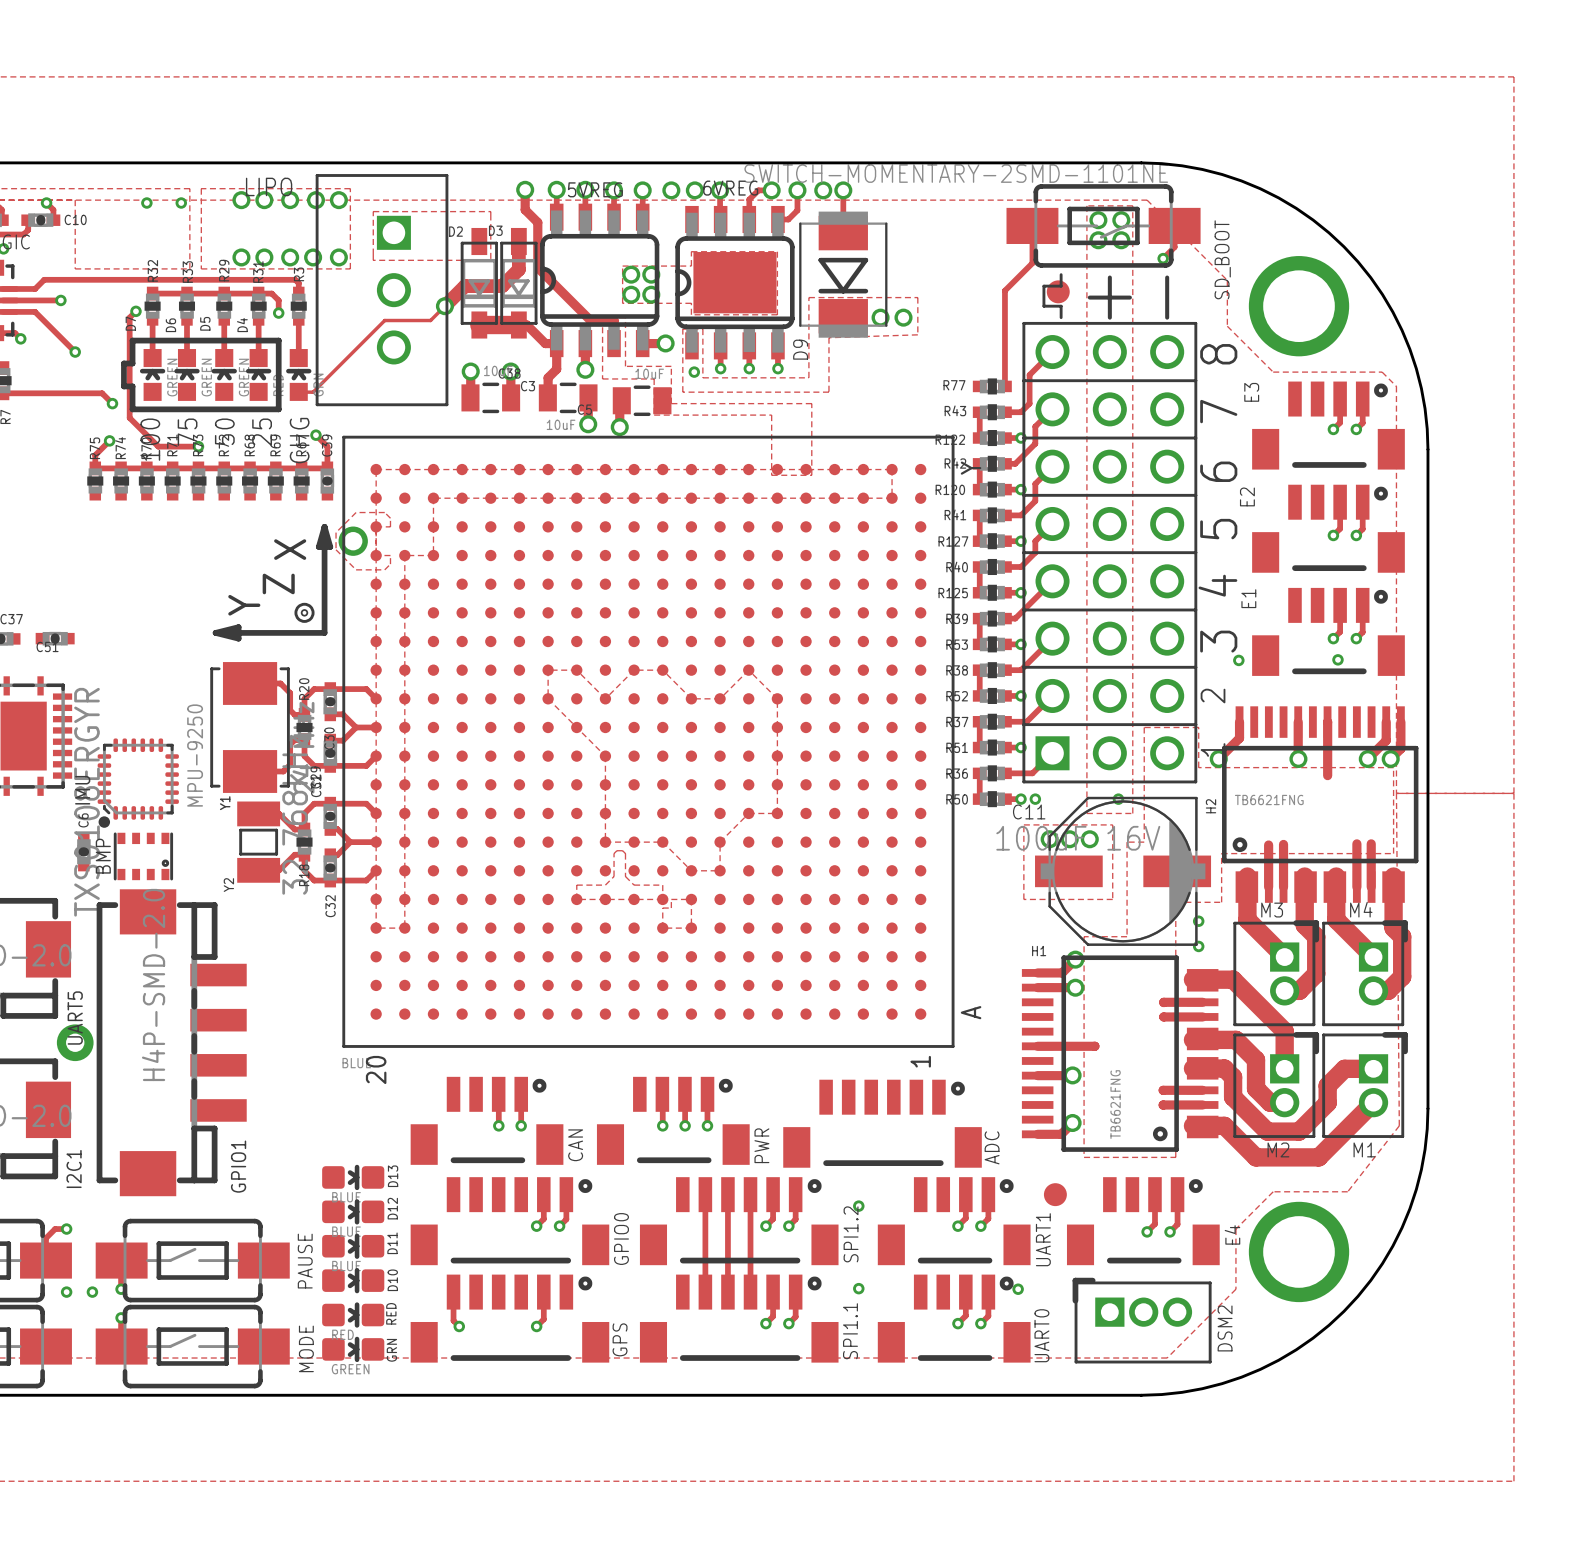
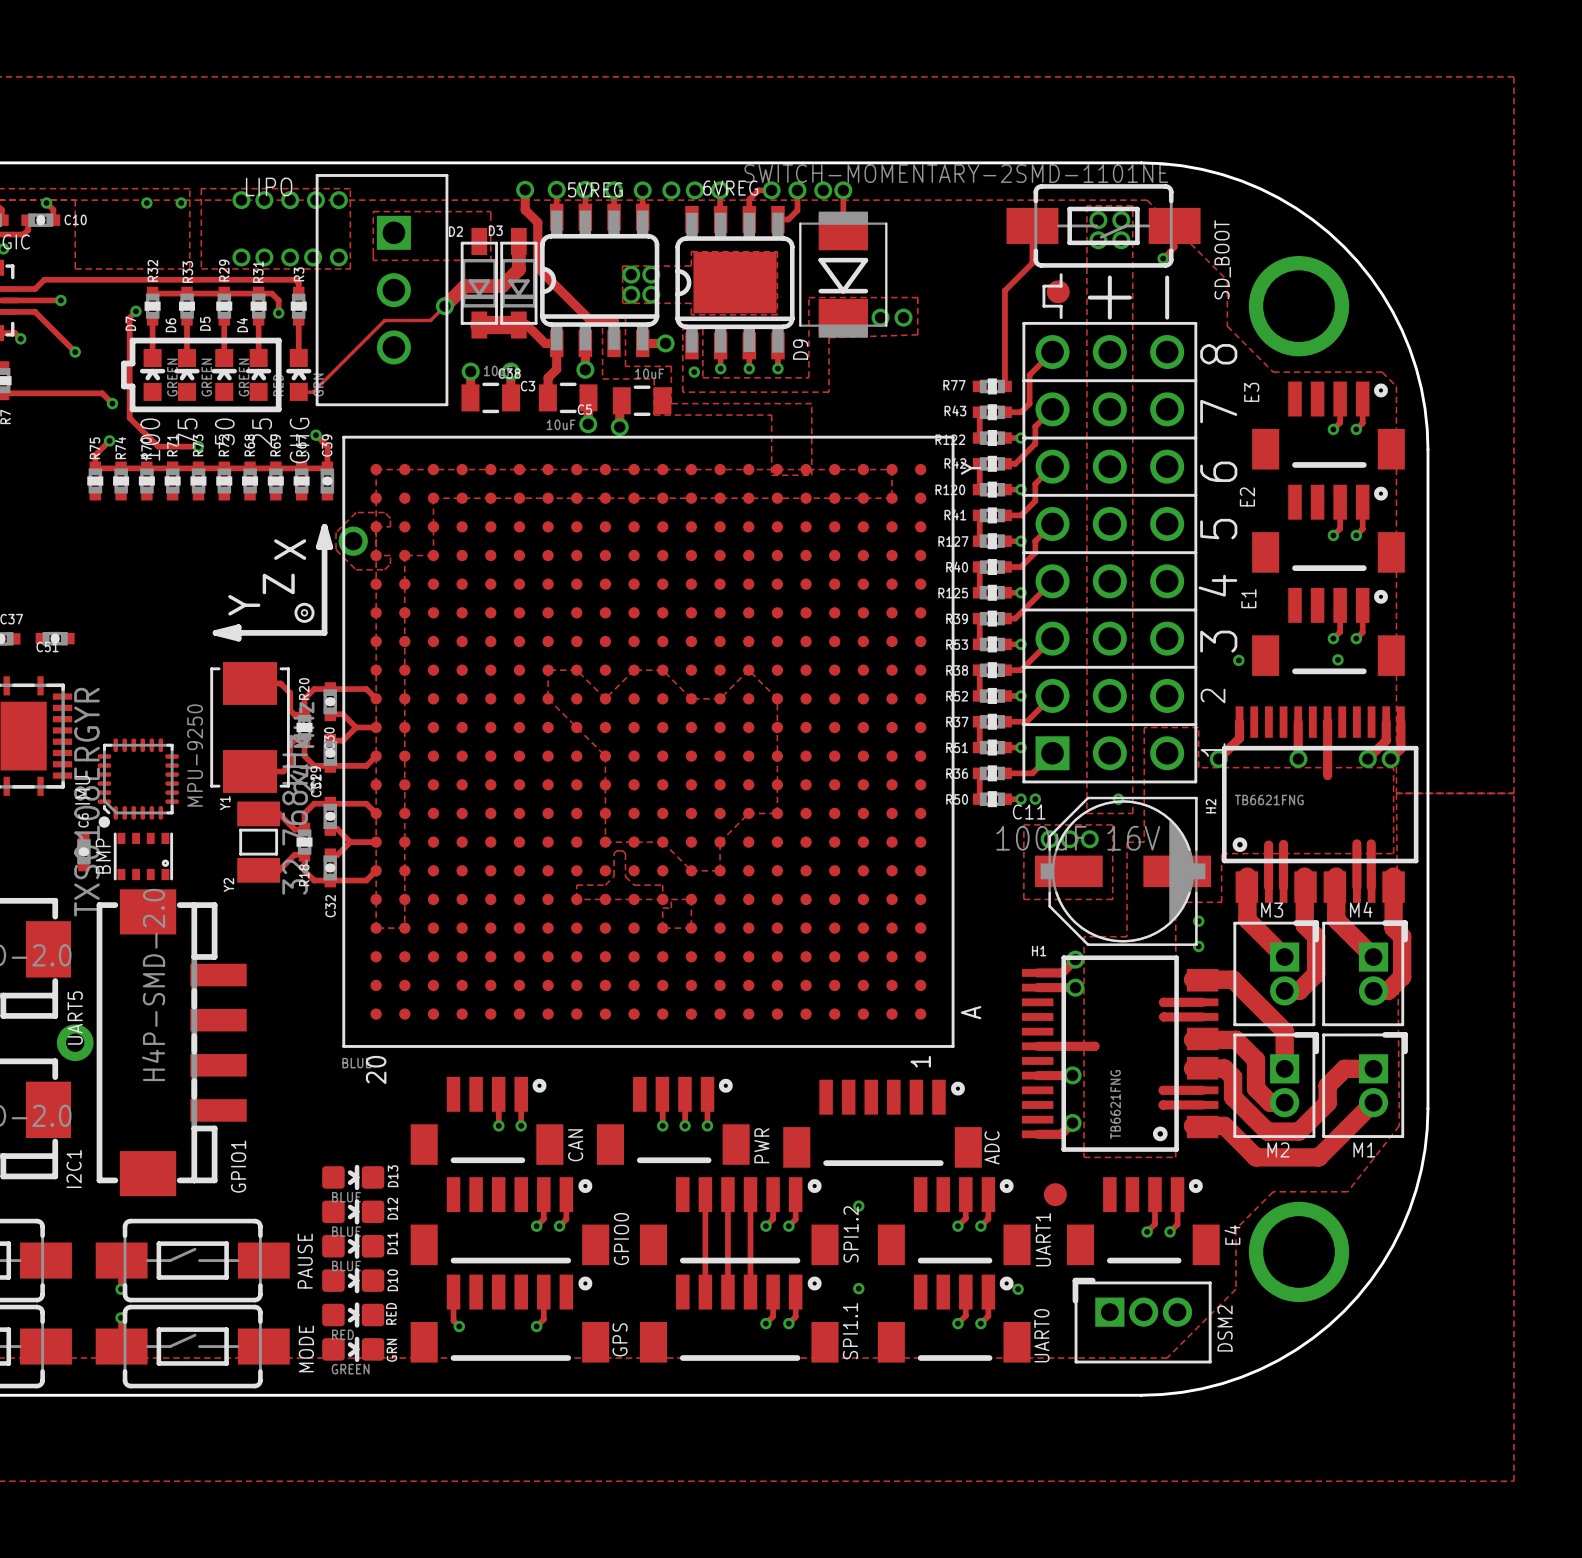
track: (66, 1229) (55, 1229) (45, 1238) (45, 1260) -> none
via: (66, 1229) -> none
via: (66, 1292) -> none
via: (92, 1292) -> none

